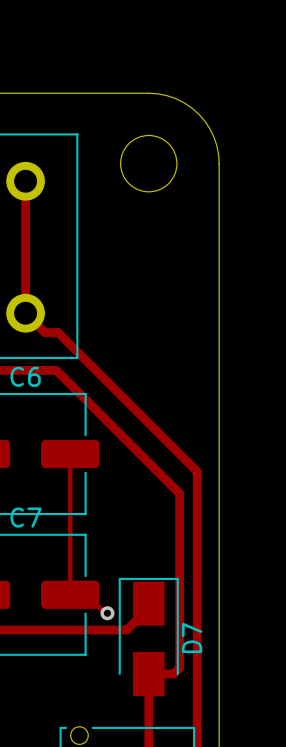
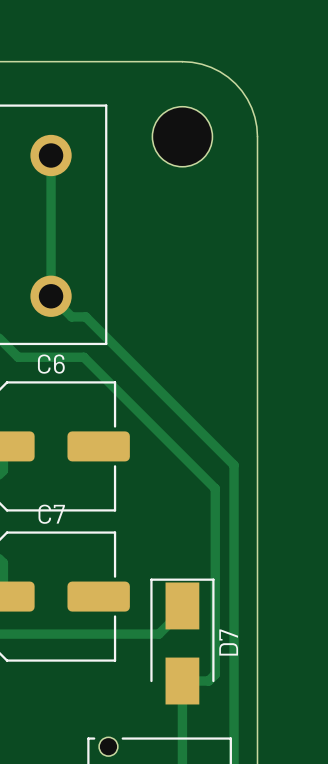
track: (70, 454) (70, 594) (98, 606) (107, 613) -> none
via: (107, 613) -> none

